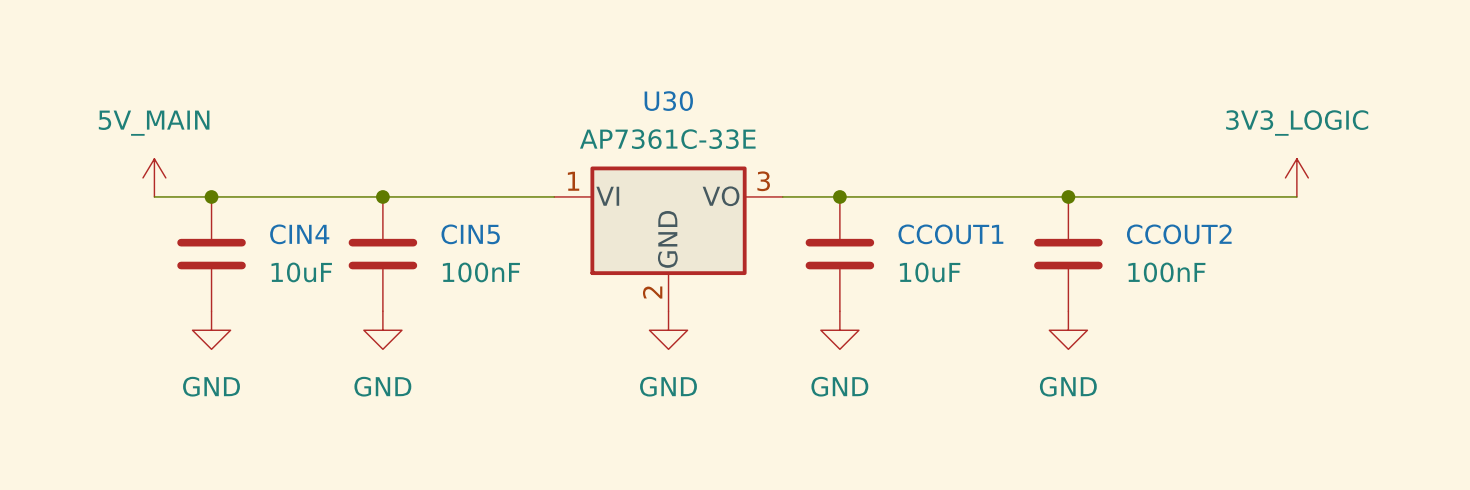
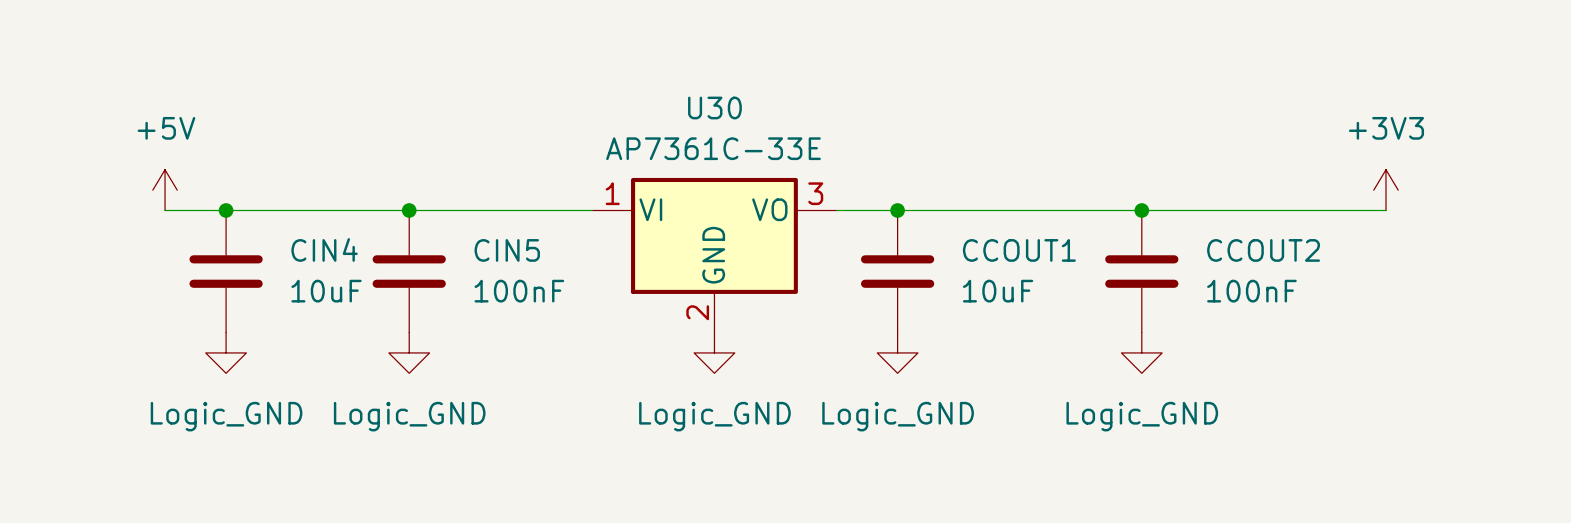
power symbol: 5V_MAIN (154, 177) -> +5V (165, 190)
power symbol: 3V3_LOGIC (1296, 177) -> +3V3 (1385, 190)
power symbol: GND (211, 330) -> Logic_GND (226, 352)
power symbol: GND (382, 330) -> Logic_GND (409, 352)
power symbol: GND (668, 330) -> Logic_GND (714, 352)
power symbol: GND (839, 330) -> Logic_GND (897, 352)
power symbol: GND (1068, 330) -> Logic_GND (1141, 352)

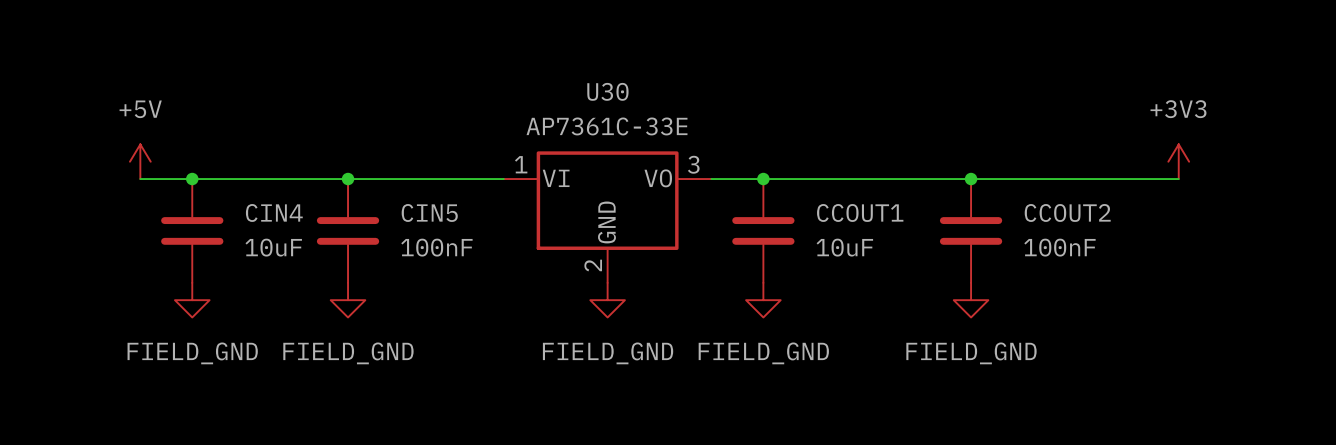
power symbol: Logic_GND (226, 352) -> FIELD_GND (192, 300)
power symbol: Logic_GND (409, 352) -> FIELD_GND (348, 300)
power symbol: Logic_GND (714, 352) -> FIELD_GND (607, 300)
power symbol: Logic_GND (897, 352) -> FIELD_GND (763, 300)
power symbol: Logic_GND (1141, 352) -> FIELD_GND (971, 300)

